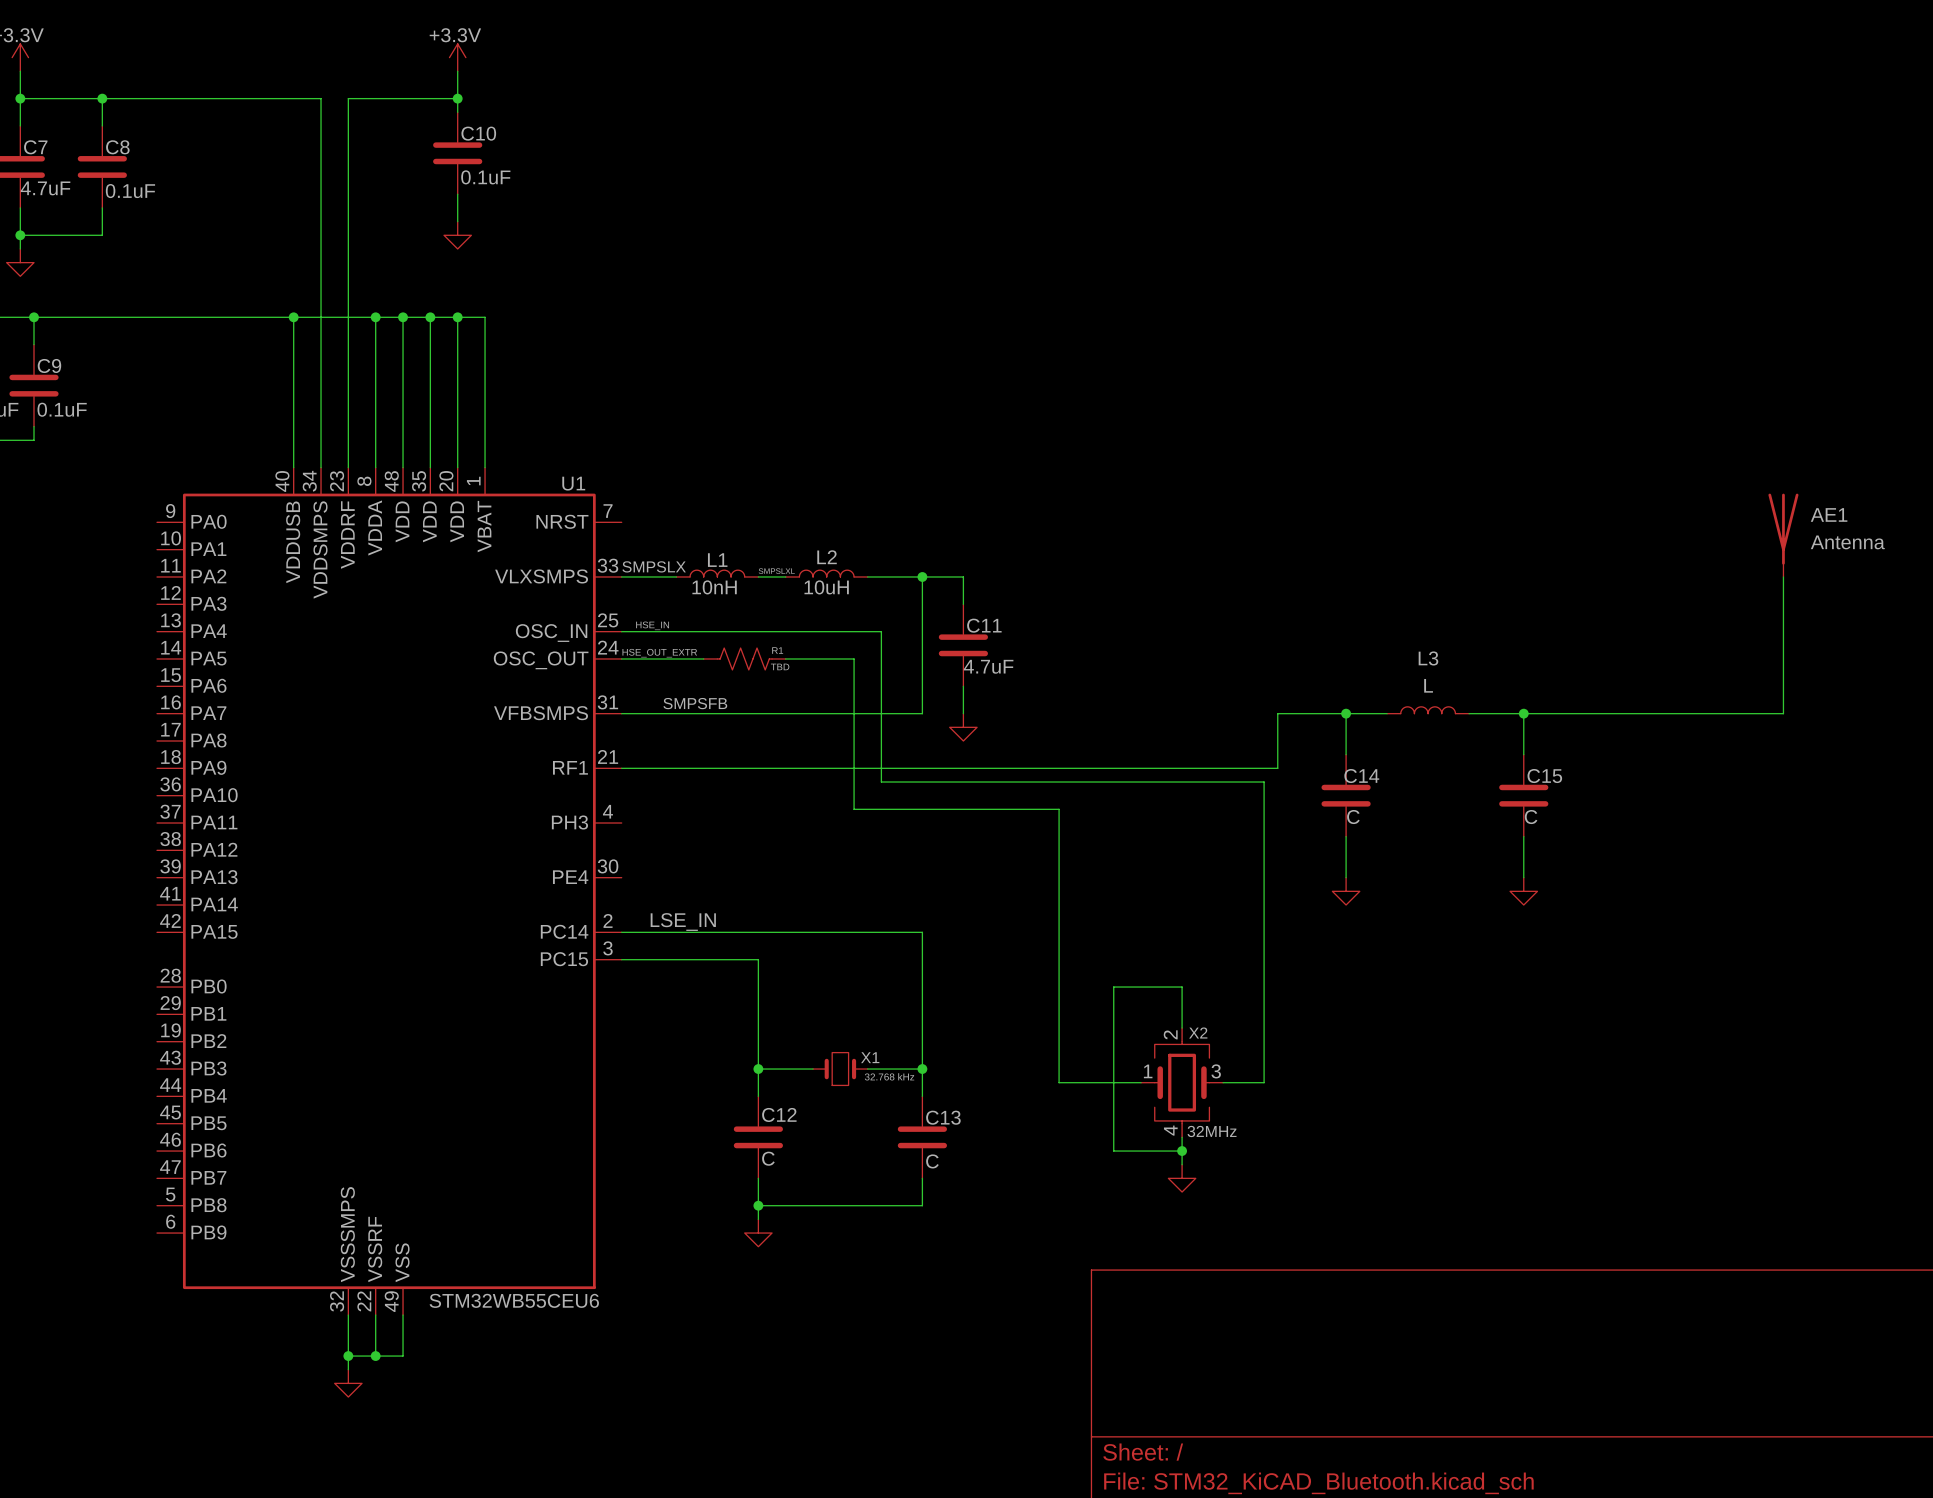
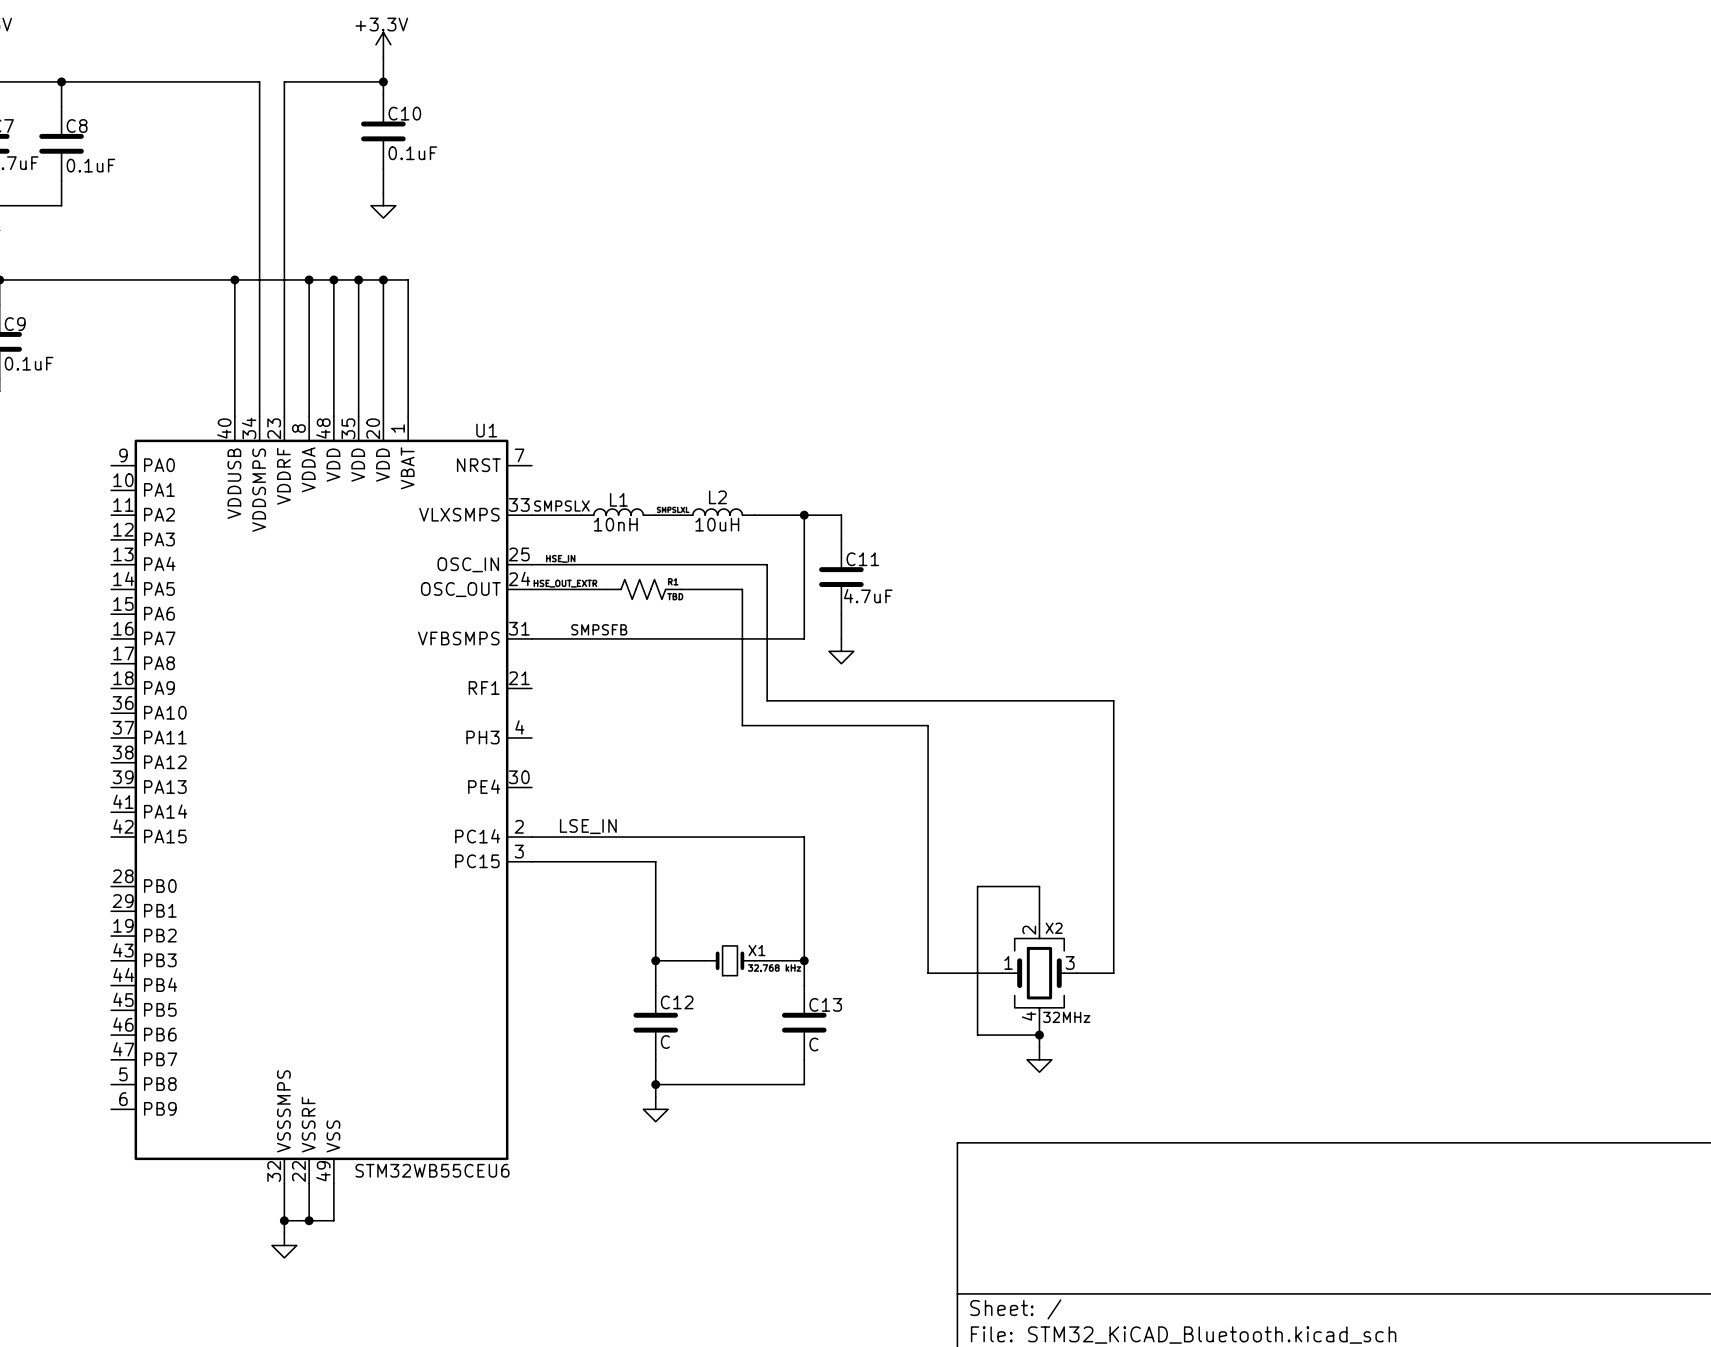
AE1: Antenna (1783, 535) -> none
wire: (1783, 576) (1783, 713) (1469, 713) -> none
L3: L (1428, 710) -> none
wire: (1346, 713) (1346, 754) -> none
junction: (1346, 713) -> none
wire: (1387, 713) (1277, 713) (1277, 768) (621, 768) -> none
wire: (1523, 713) (1523, 754) -> none
junction: (1523, 713) -> none
C14: C (1346, 795) -> none
C15: C (1523, 795) -> none
wire: (1346, 836) (1346, 877) -> none
wire: (1523, 836) (1523, 877) -> none
power symbol: (1346, 891) -> none
power symbol: (1523, 891) -> none

